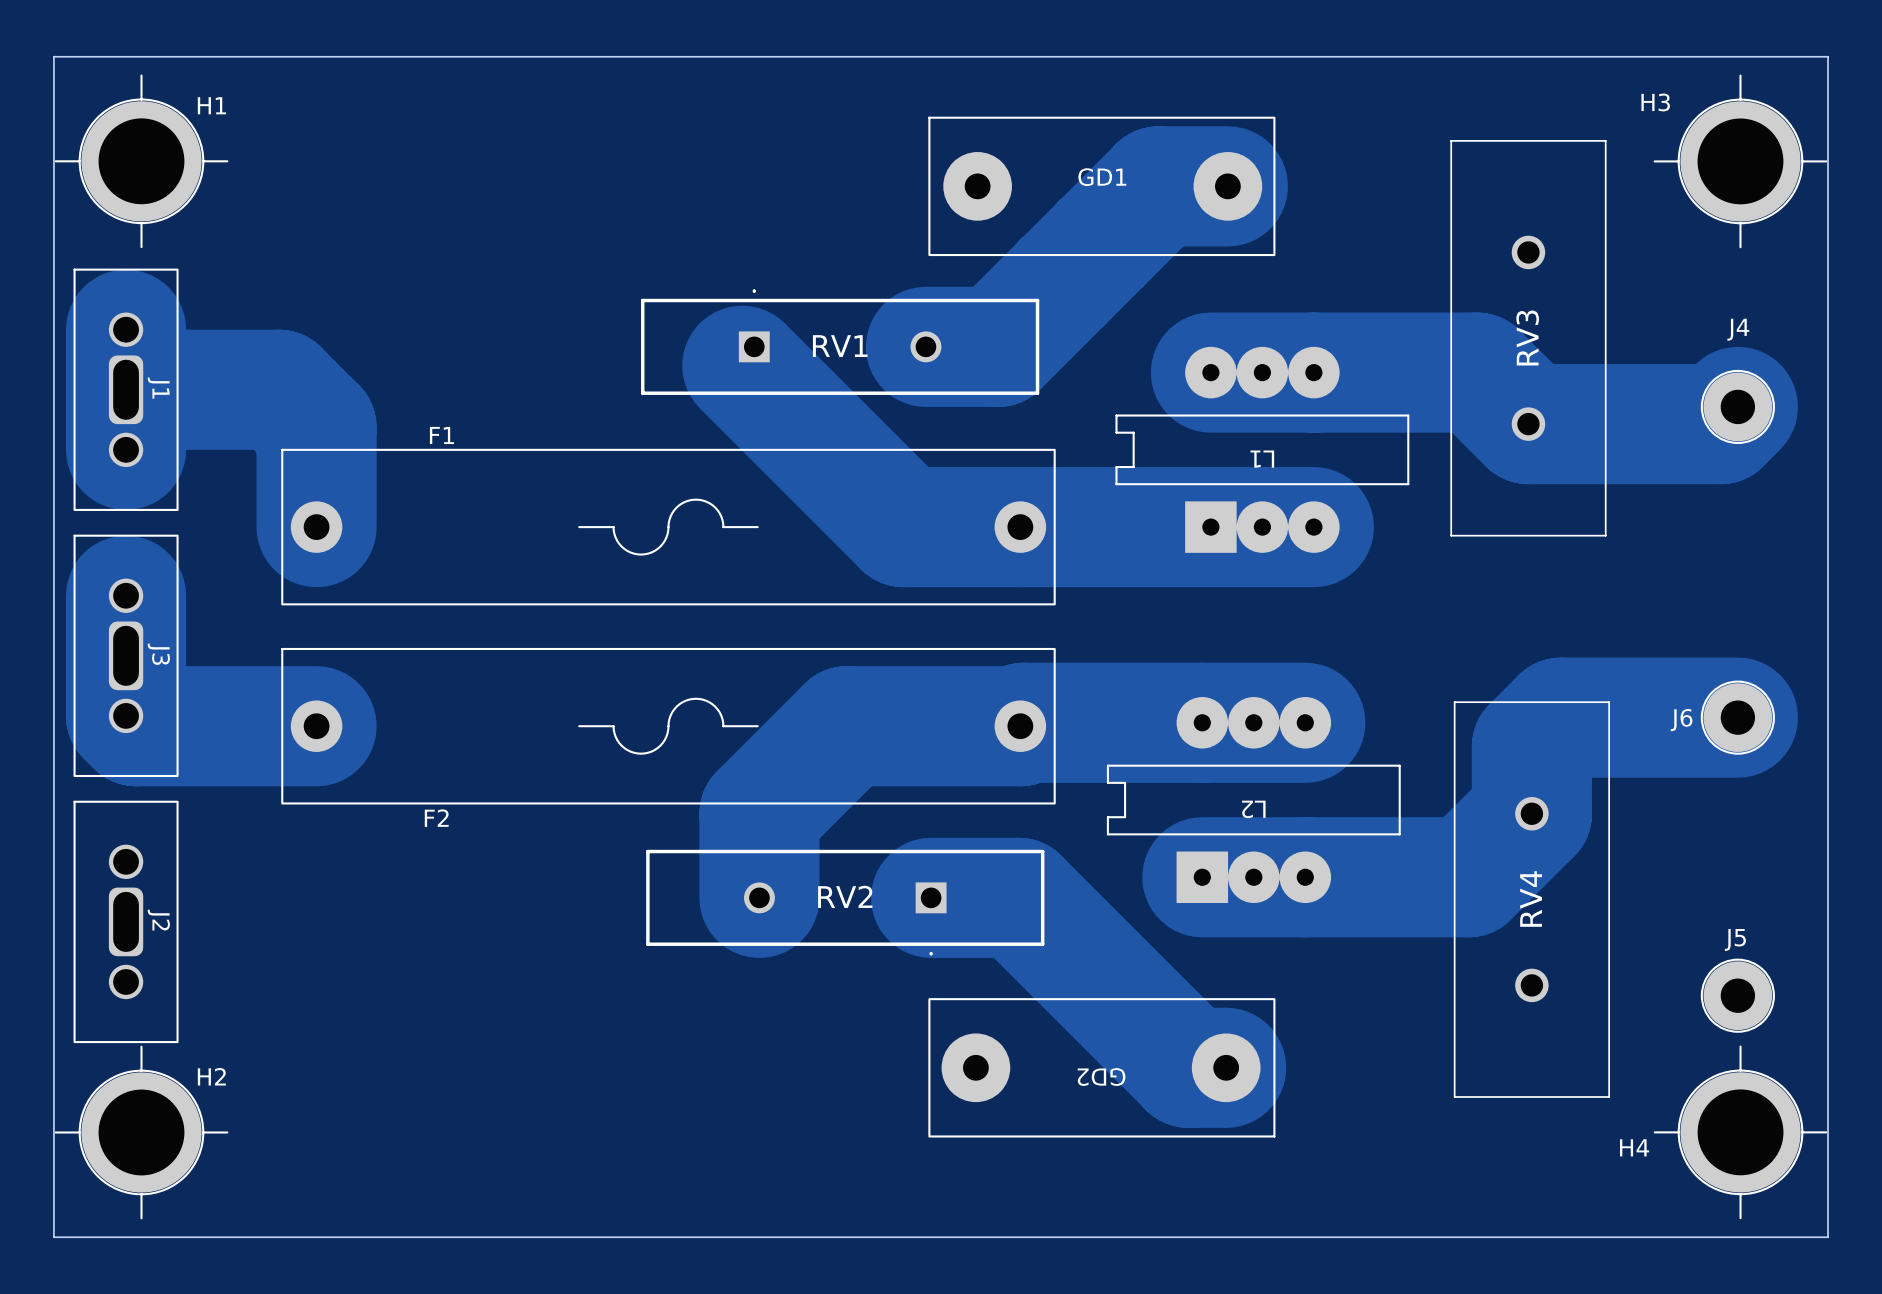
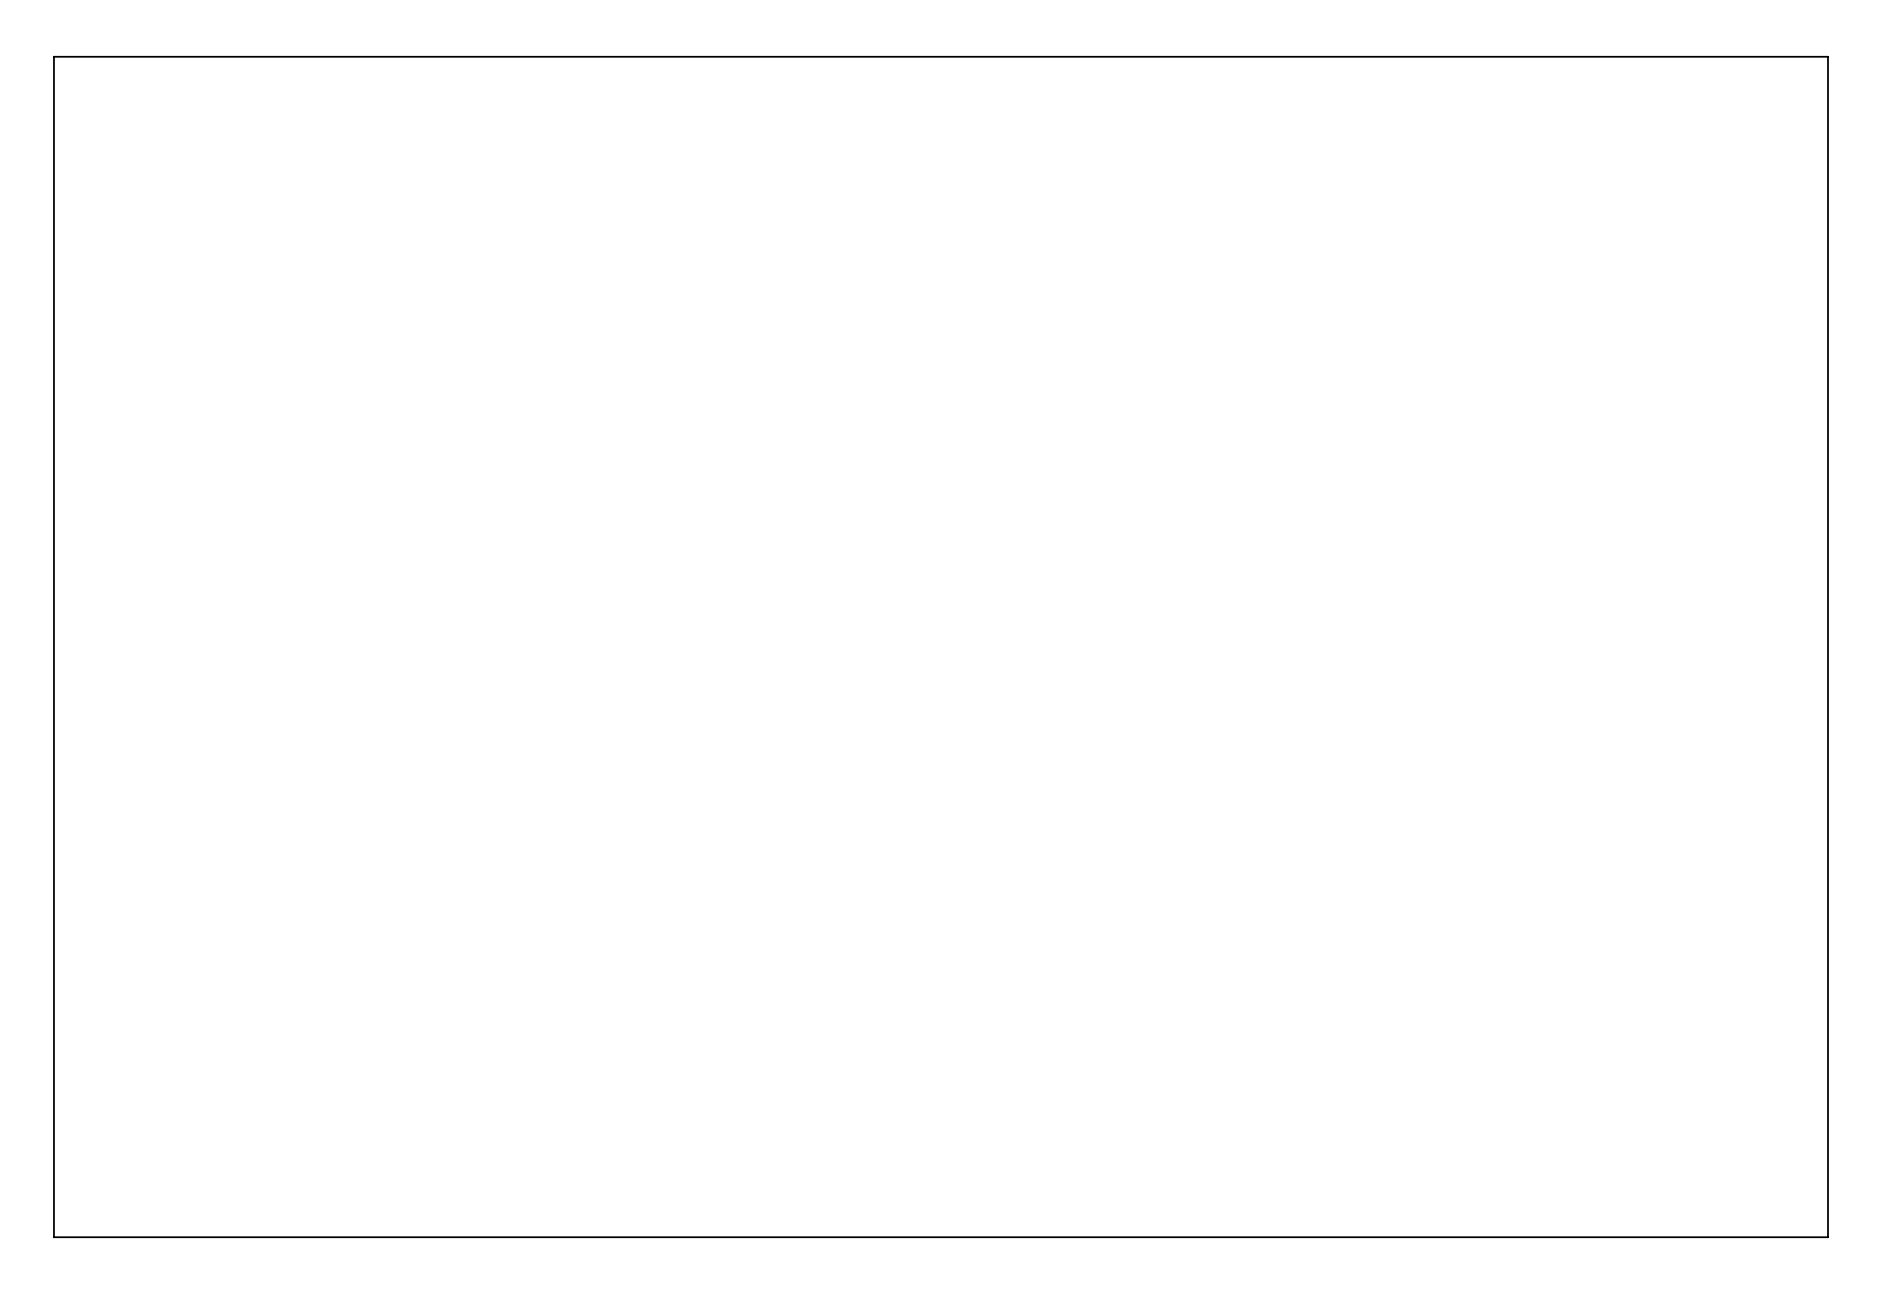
H1: (141, 161) -> none
H3: (1740, 161) -> none
GD1: (1101, 186) -> none
track: (1227, 186) (1158, 186) (998, 346) (925, 346) -> none
track: (126, 329) (126, 449) -> none
RV3: (1528, 338) -> none
RV1: (840, 342) -> none
track: (742, 365) (903, 527) (1313, 527) -> none
track: (1210, 372) (1476, 372) (1528, 424) (1720, 424) (1737, 406) -> none
track: (126, 389) (278, 389) (316, 427) (316, 527) -> none
J1: (126, 389) -> none
J4: (1737, 406) -> none
L1: (1262, 449) -> none
F1: (668, 527) -> none
track: (126, 595) (126, 715) (136, 726) (316, 726) -> none
J3: (126, 655) -> none
track: (1737, 717) (1561, 717) (1531, 746) (1531, 813) (1468, 877) (1202, 877) -> none
J6: (1737, 717) -> none
track: (1305, 722) (1023, 722) (1020, 726) (846, 726) (759, 813) (759, 897) -> none
F2: (668, 726) -> none
L2: (1253, 800) -> none
track: (931, 897) (1018, 897) (1188, 1067) (1226, 1067) -> none
RV4: (1531, 899) -> none
RV2: (845, 902) -> none
J2: (126, 921) -> none
J5: (1737, 995) -> none
GD2: (1101, 1067) -> none
H2: (141, 1132) -> none
H4: (1740, 1132) -> none

